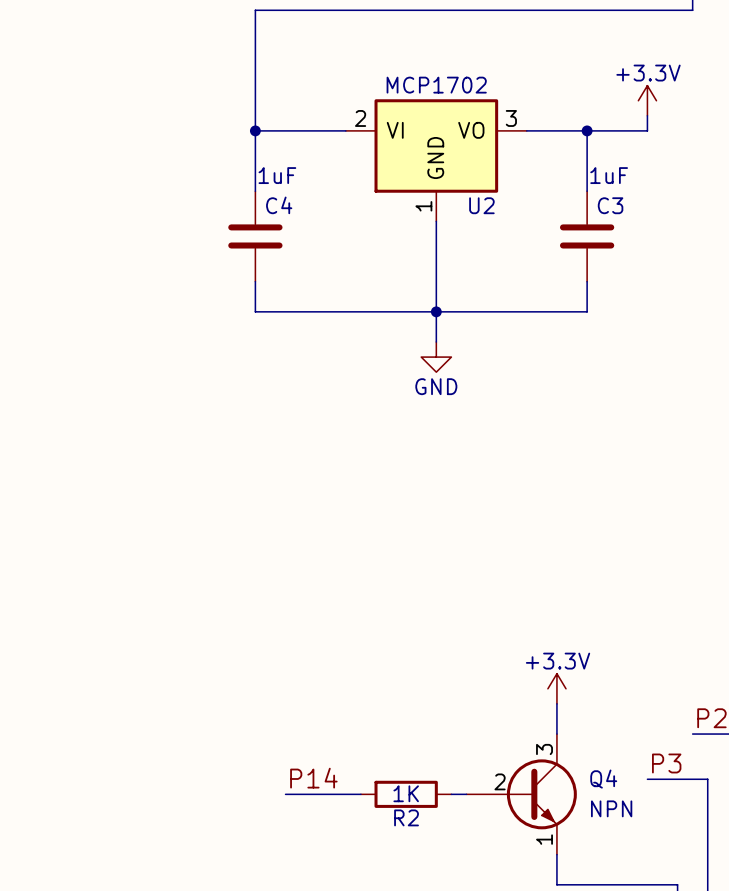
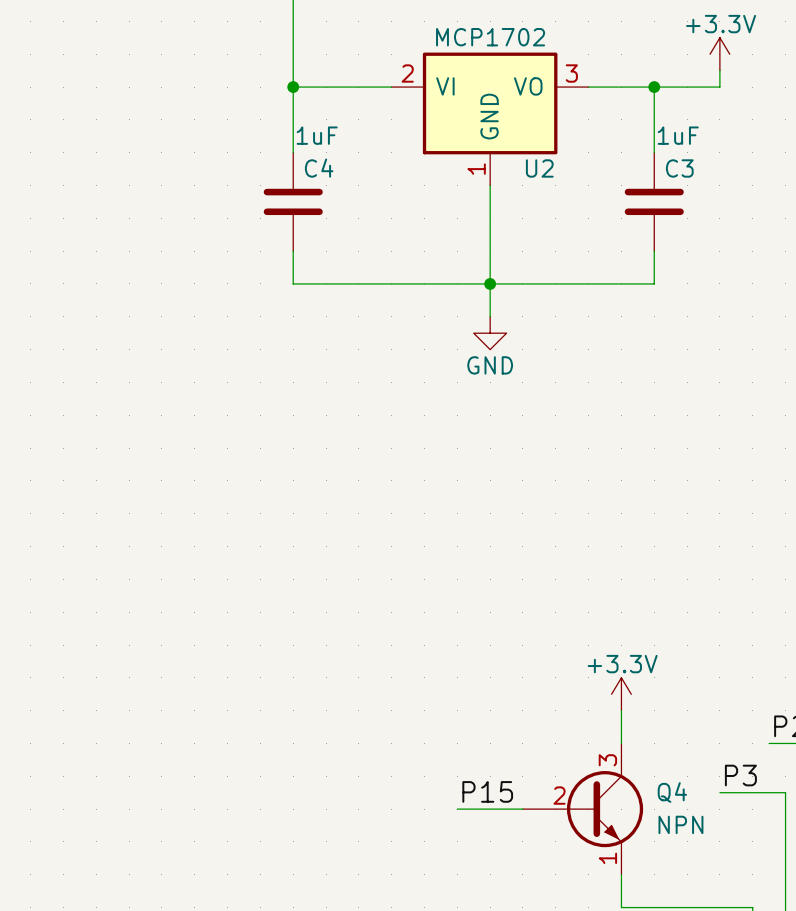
label: P14 (313, 778) -> none
label: none -> P15 (487, 791)
wire: (285, 794) (360, 794) -> none
wire: none -> (457, 809) (506, 809)
R2: 1K (406, 794) -> none

